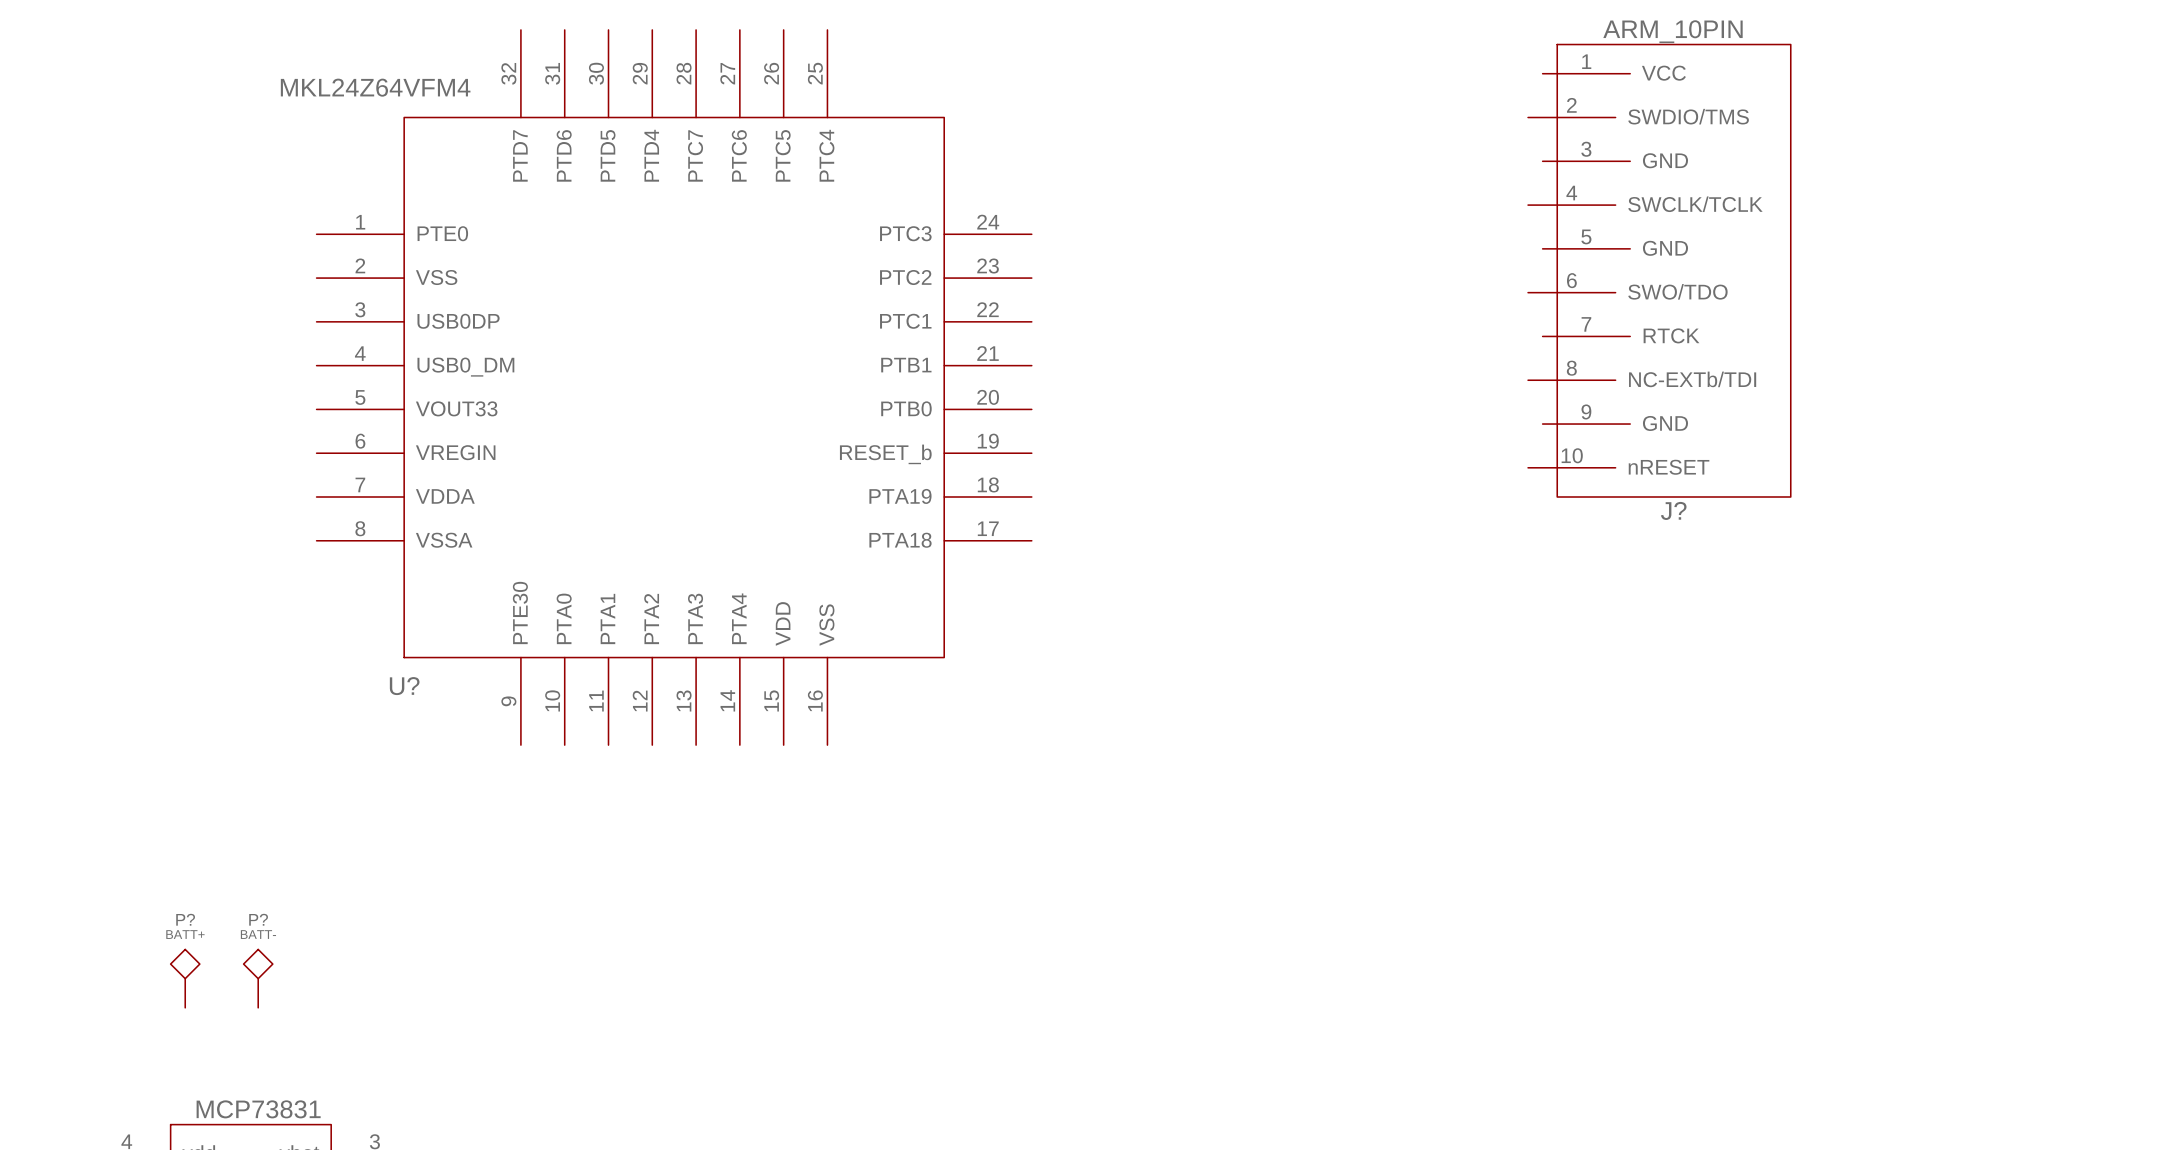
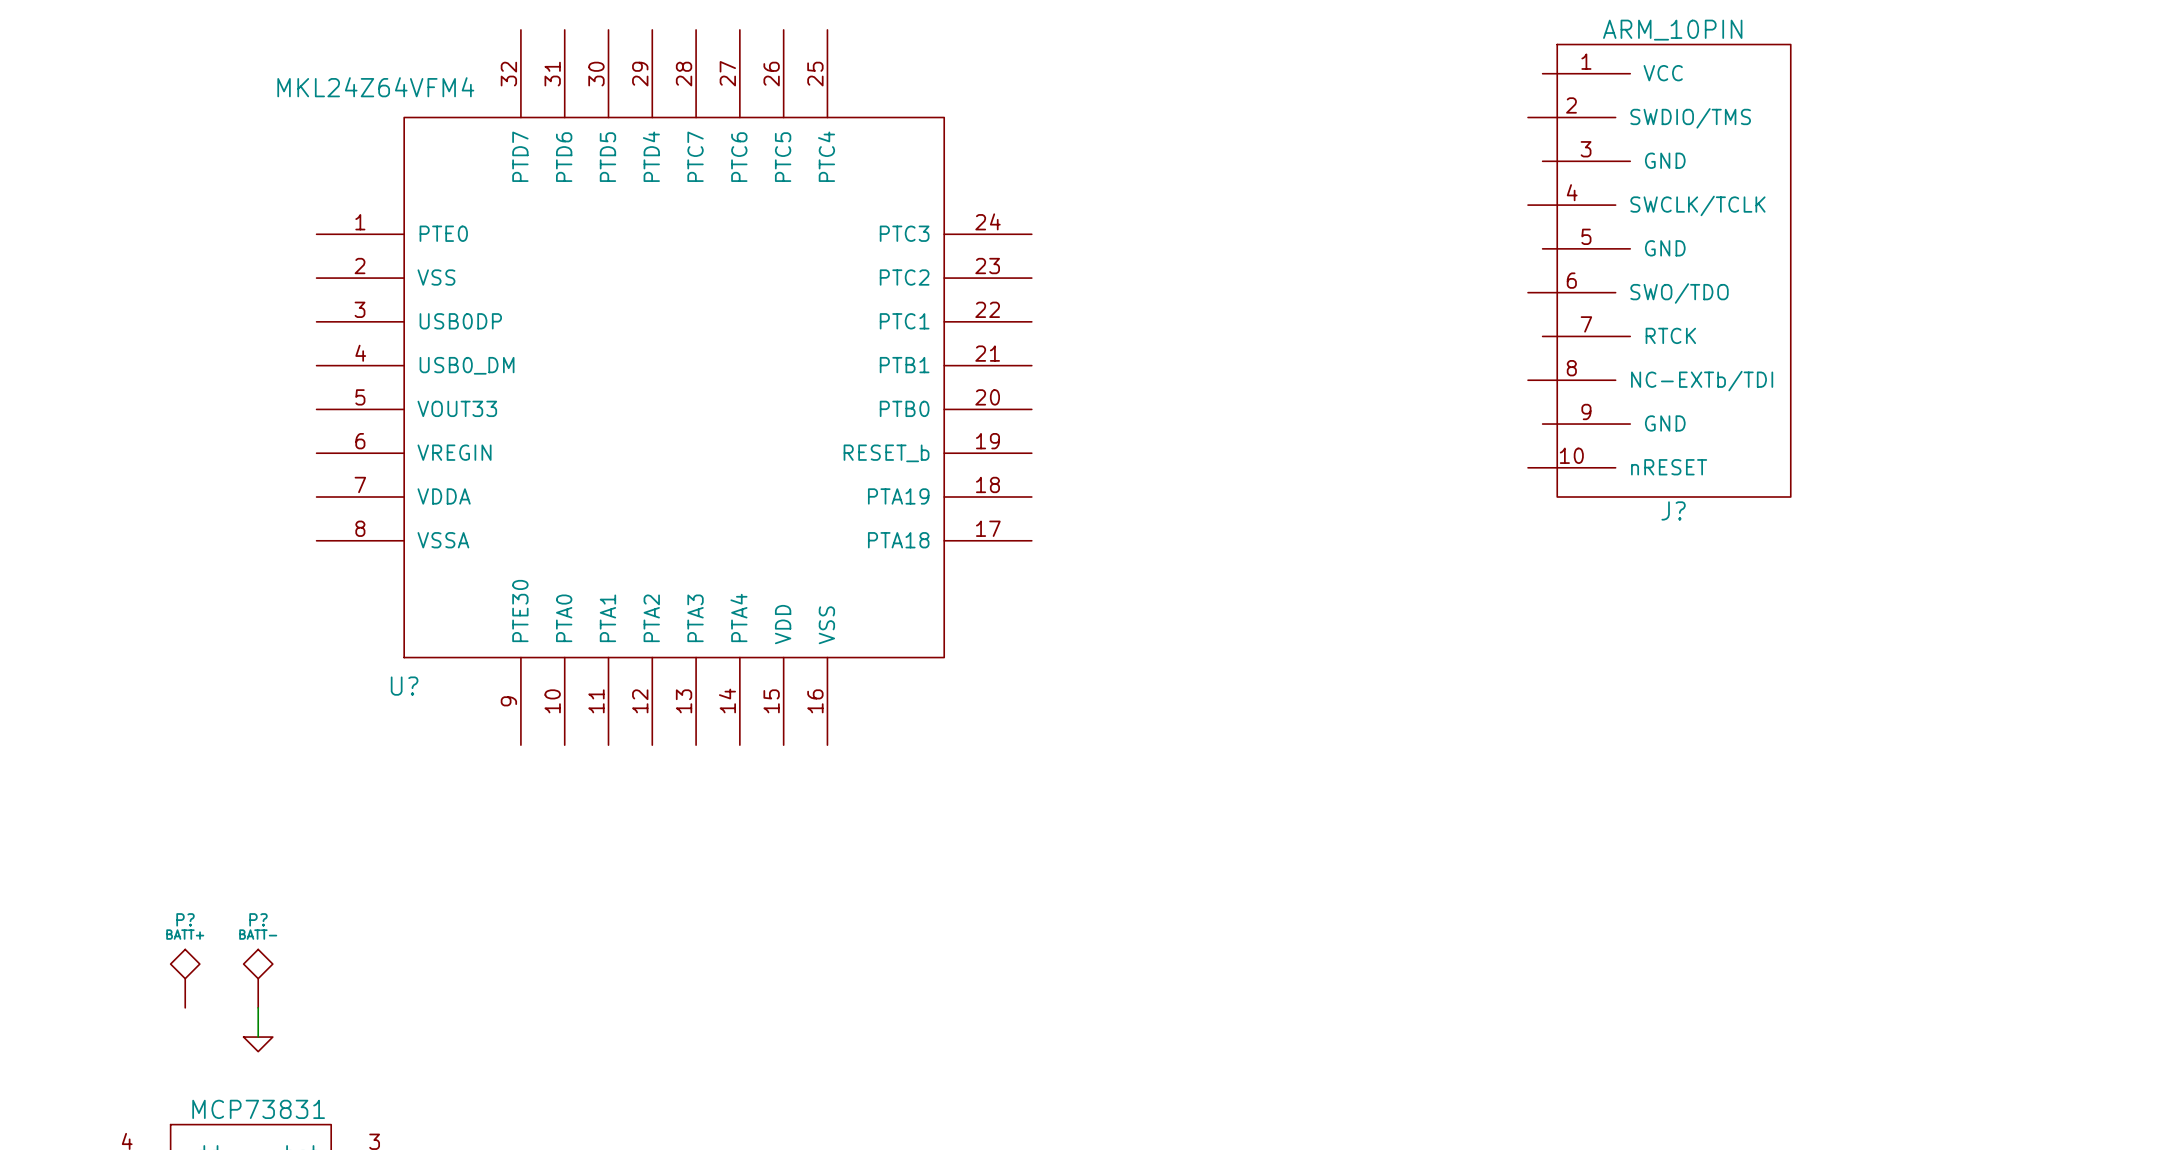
wire: none -> (258, 1007) (258, 1037)
power symbol: none -> (258, 1044)

